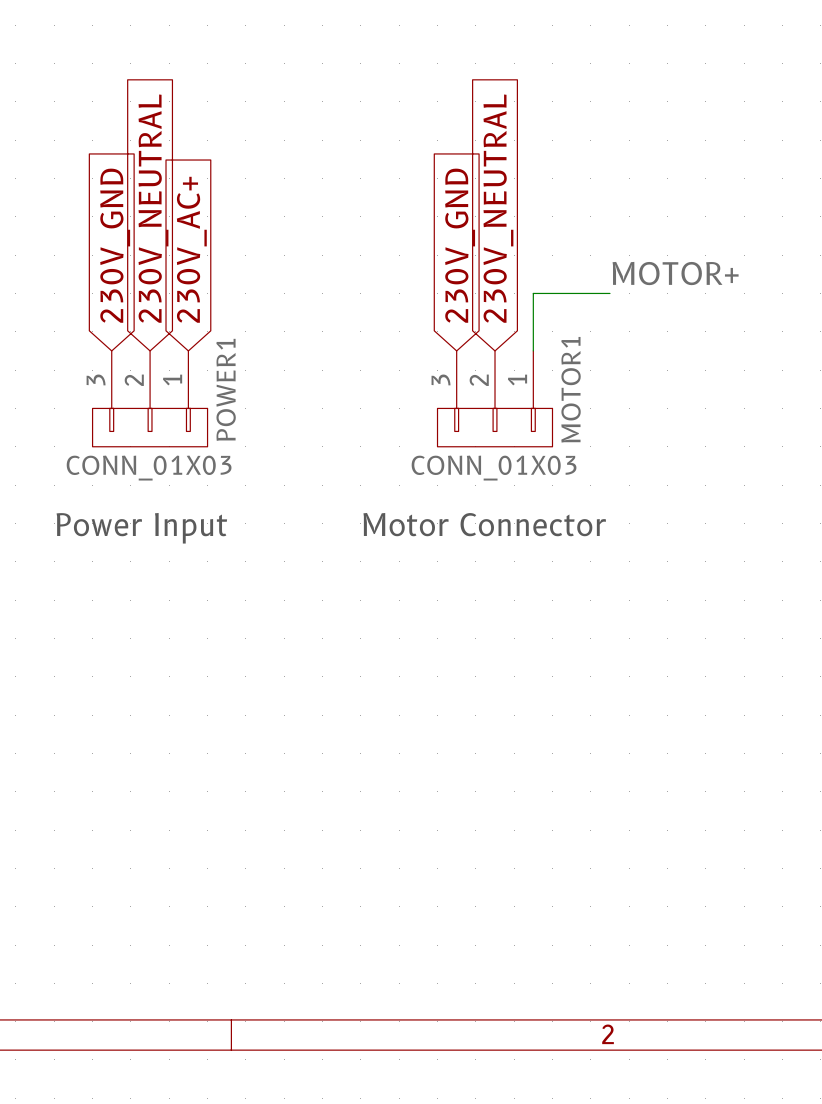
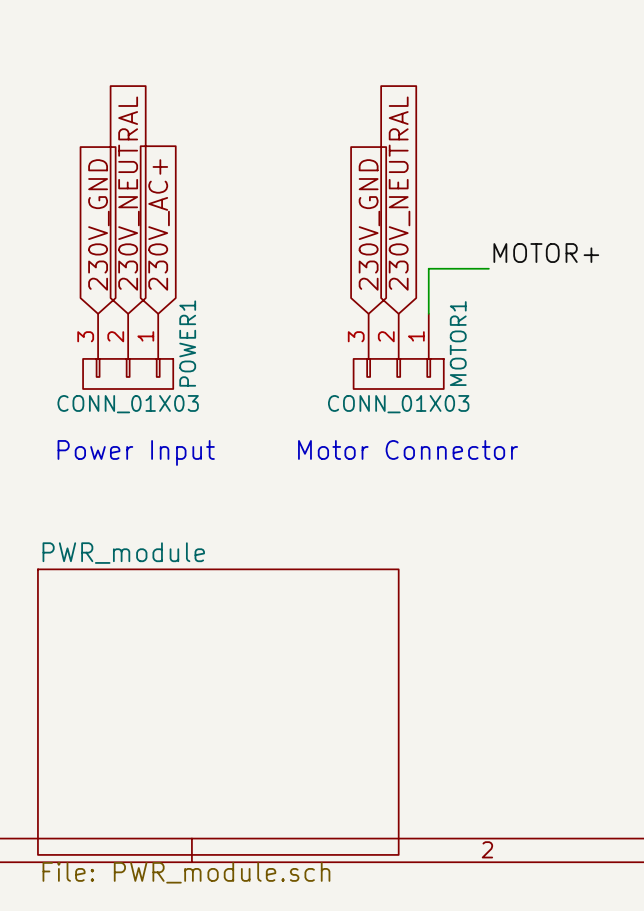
sheet PWR_module: none -> File: PWR_module.sch (218, 712)

